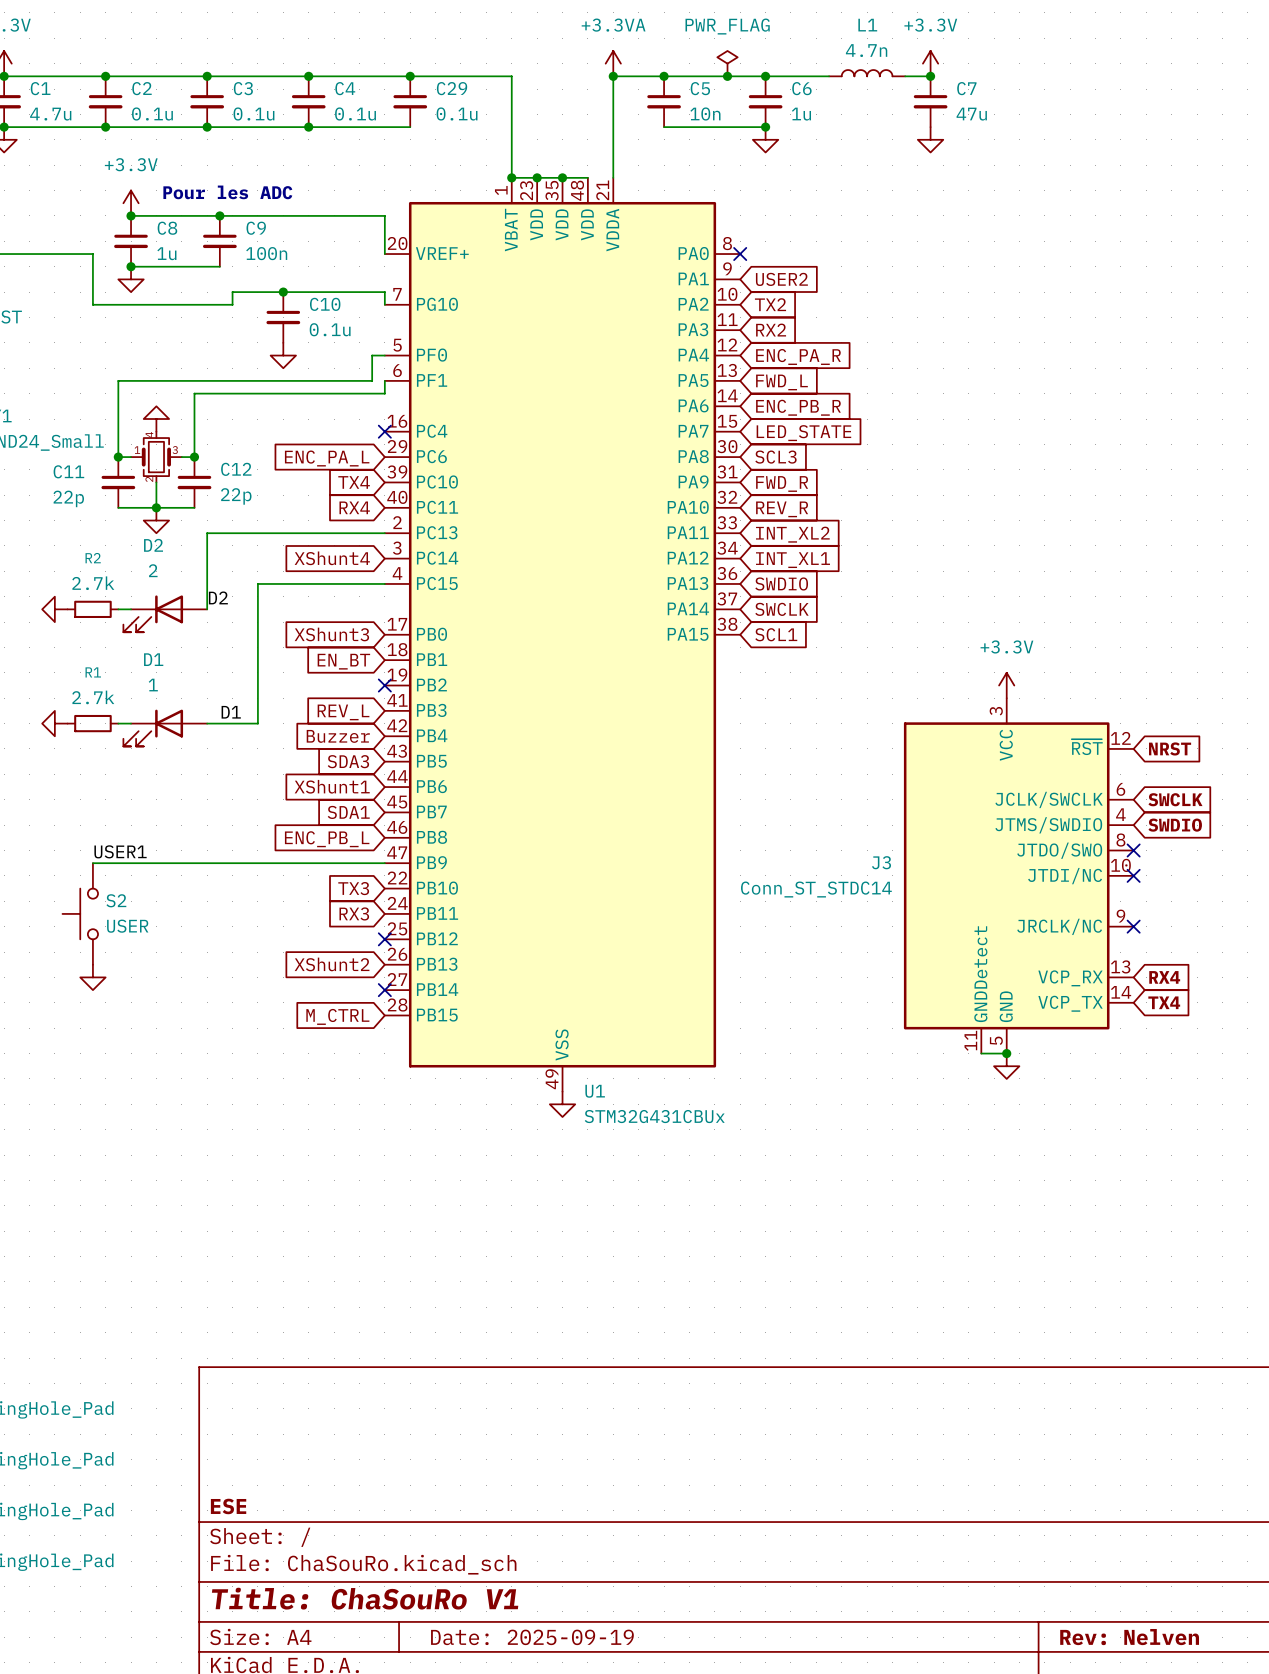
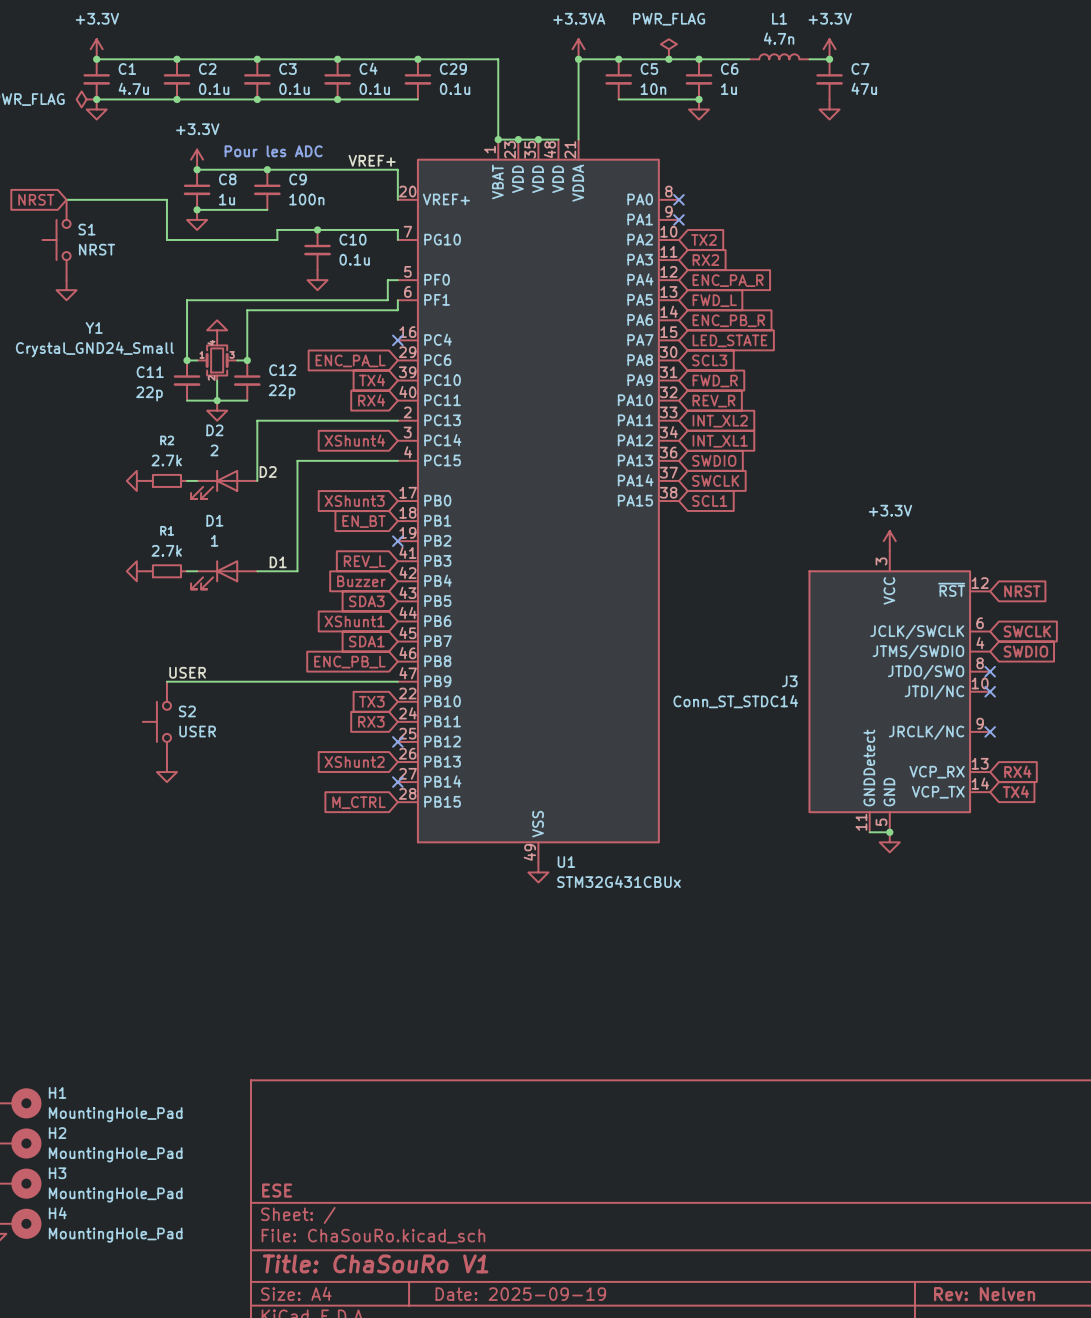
label: none -> VREF+ (372, 160)
no-connect mark: none -> (678, 219)
global label: USER2 (781, 279) -> none
label: USER1 (120, 851) -> USER (187, 672)

